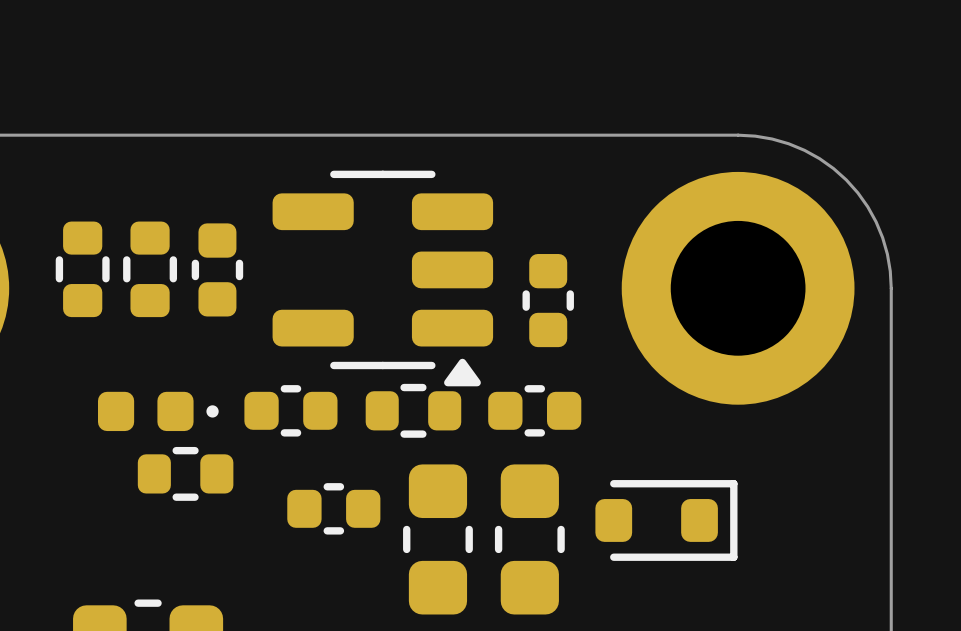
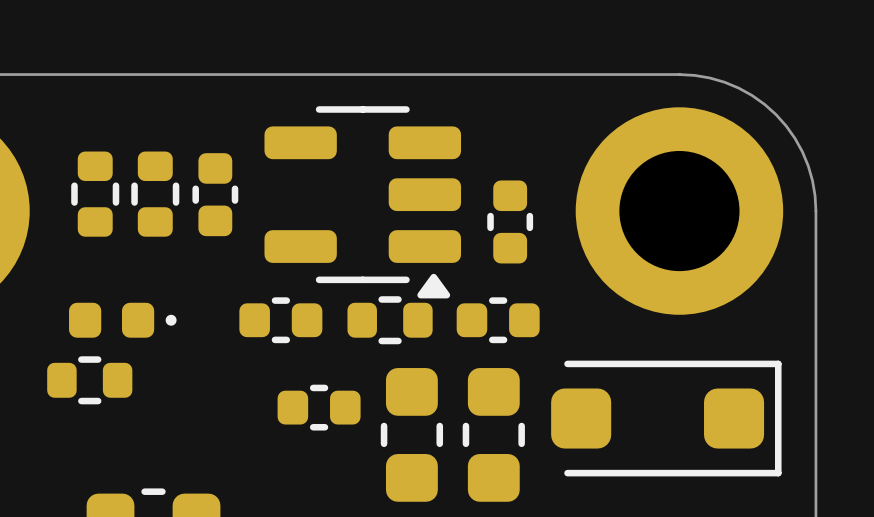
part position: (158, 411) -> (122, 320)
part position: (185, 473) -> (89, 380)
part footprint: [595, 480, 738, 561] -> [551, 360, 782, 477]

